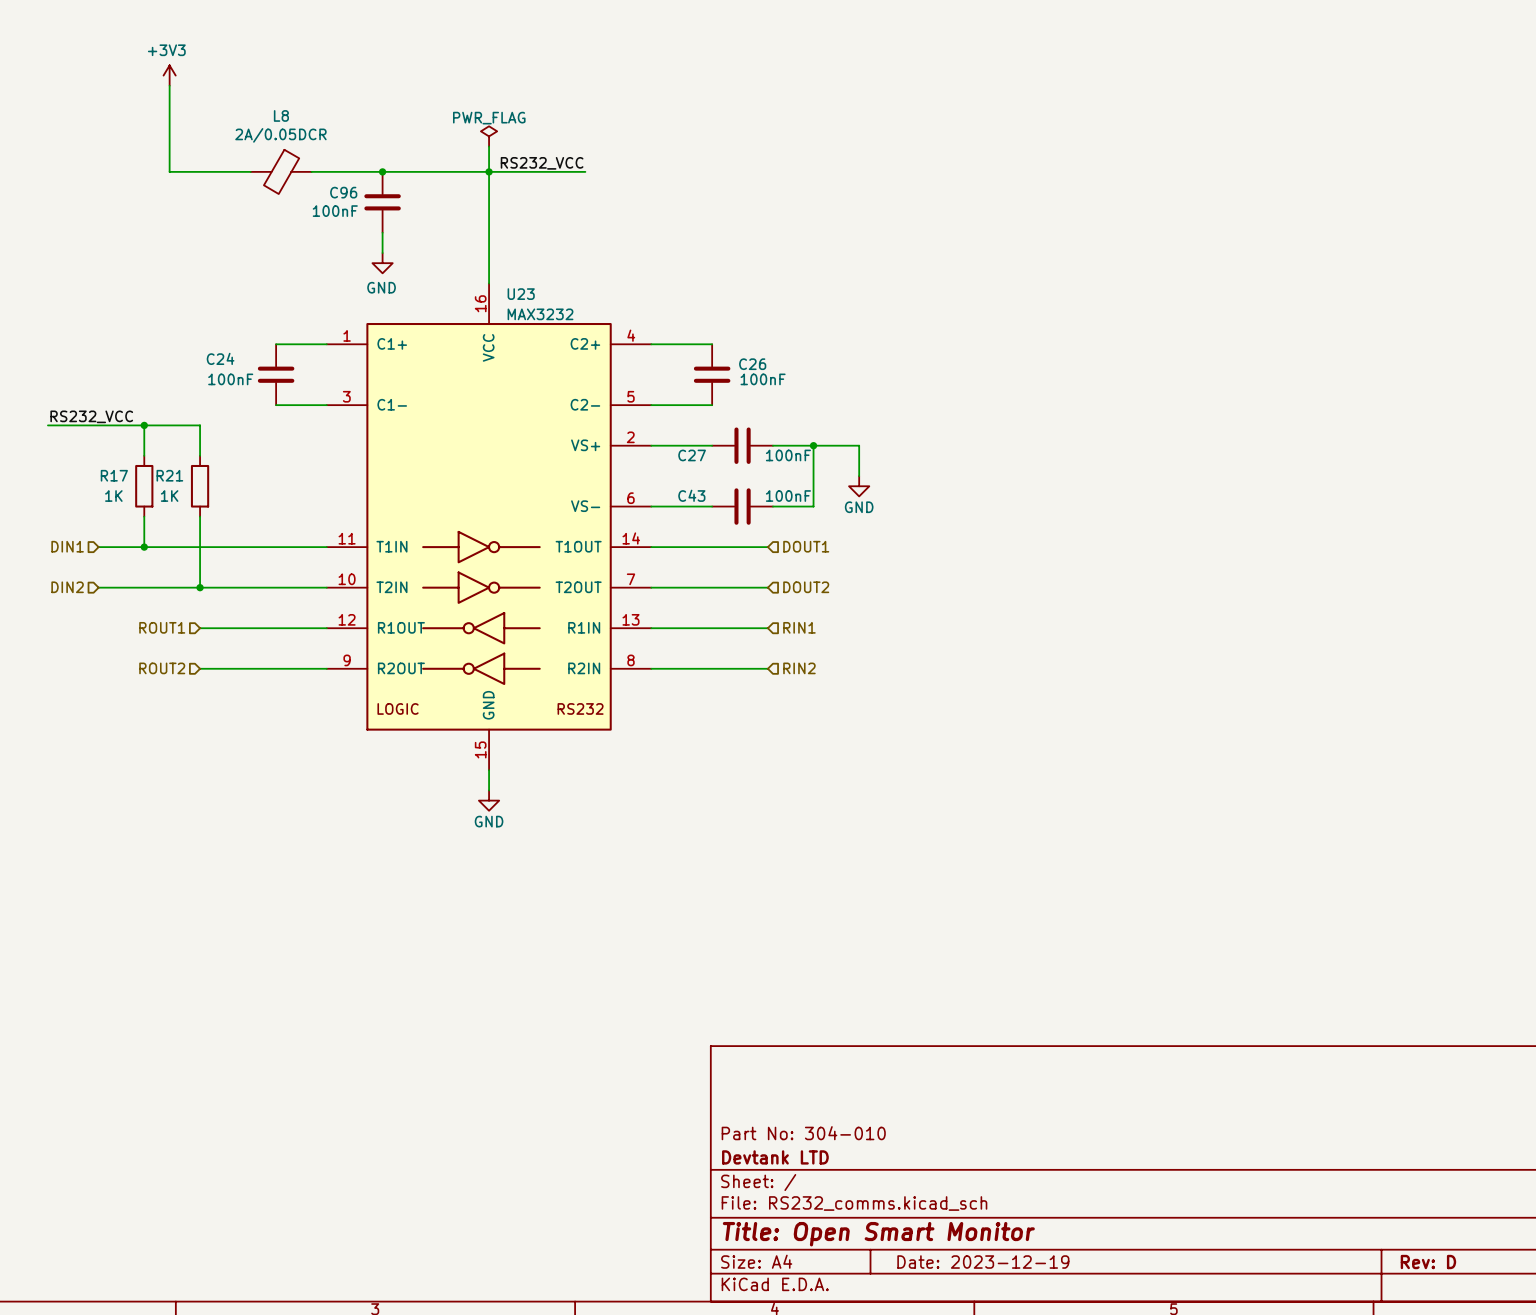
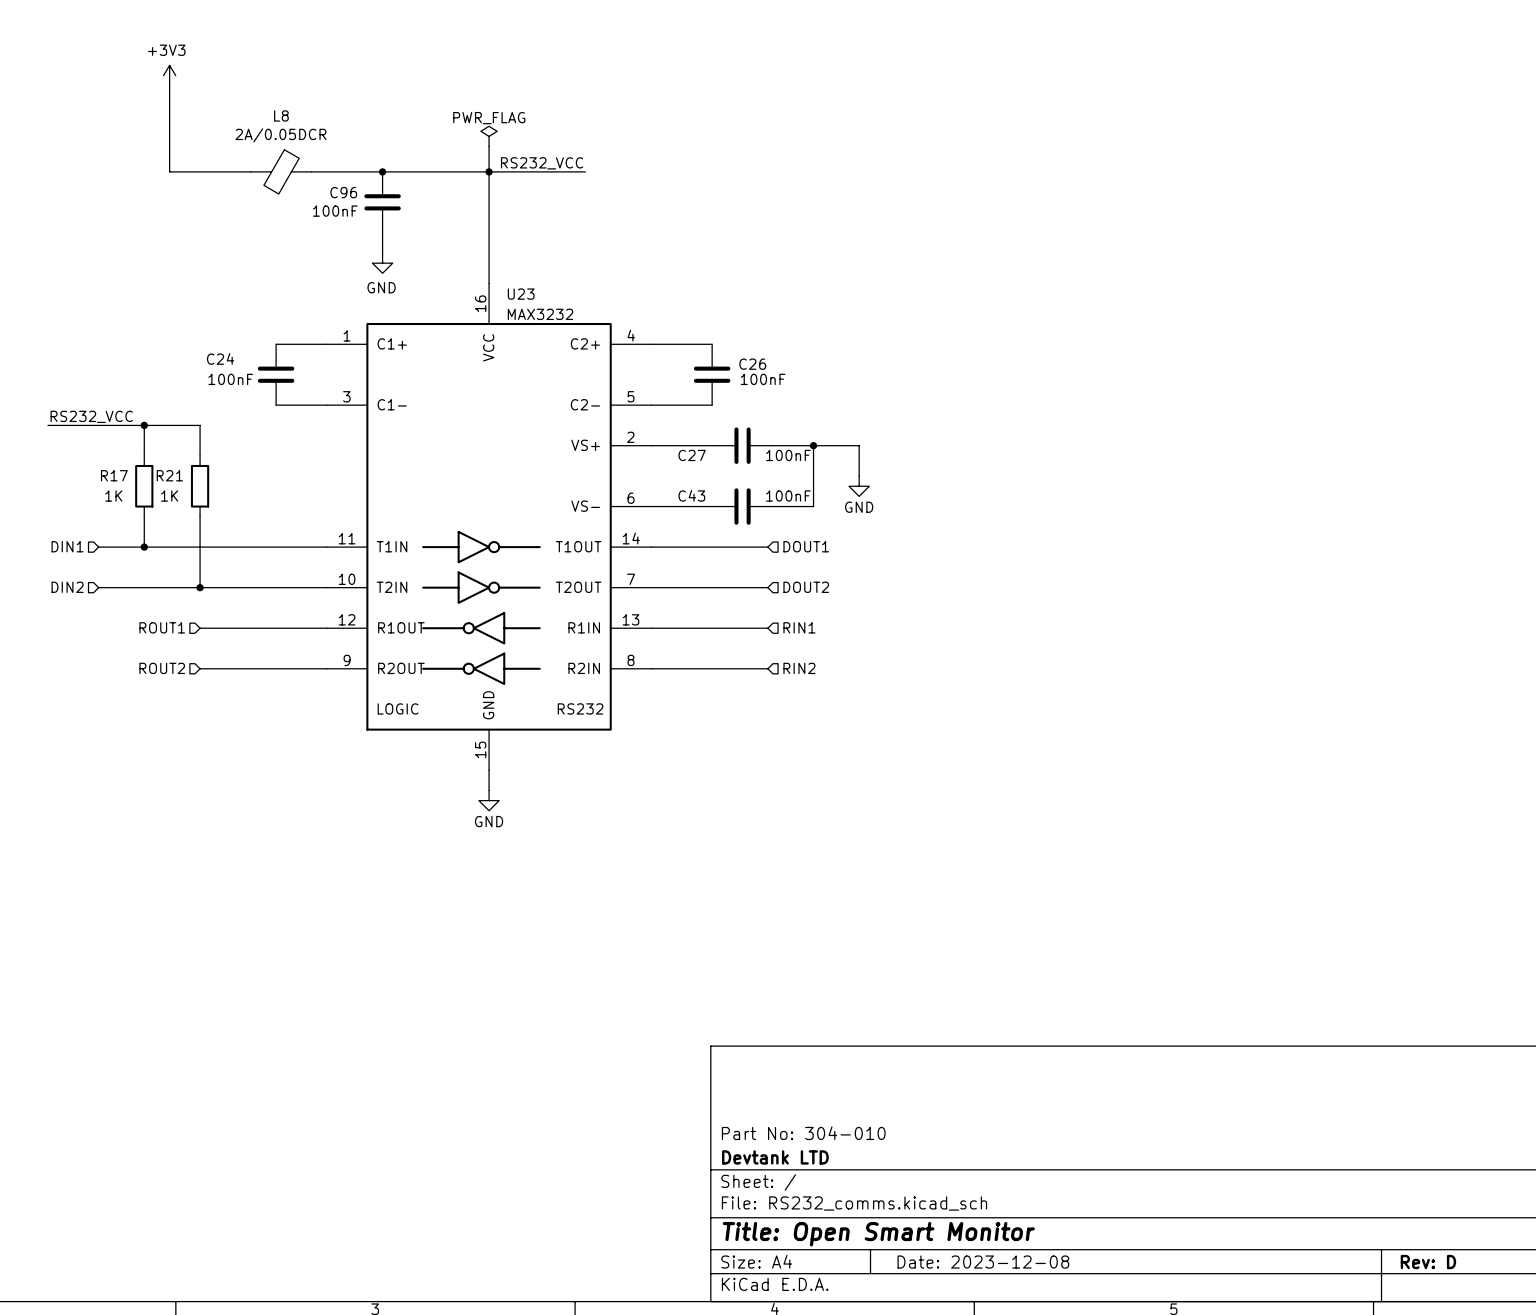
title block: Date: 2023-12-19 (983, 1262) -> Date: 2023-12-08 (983, 1262)

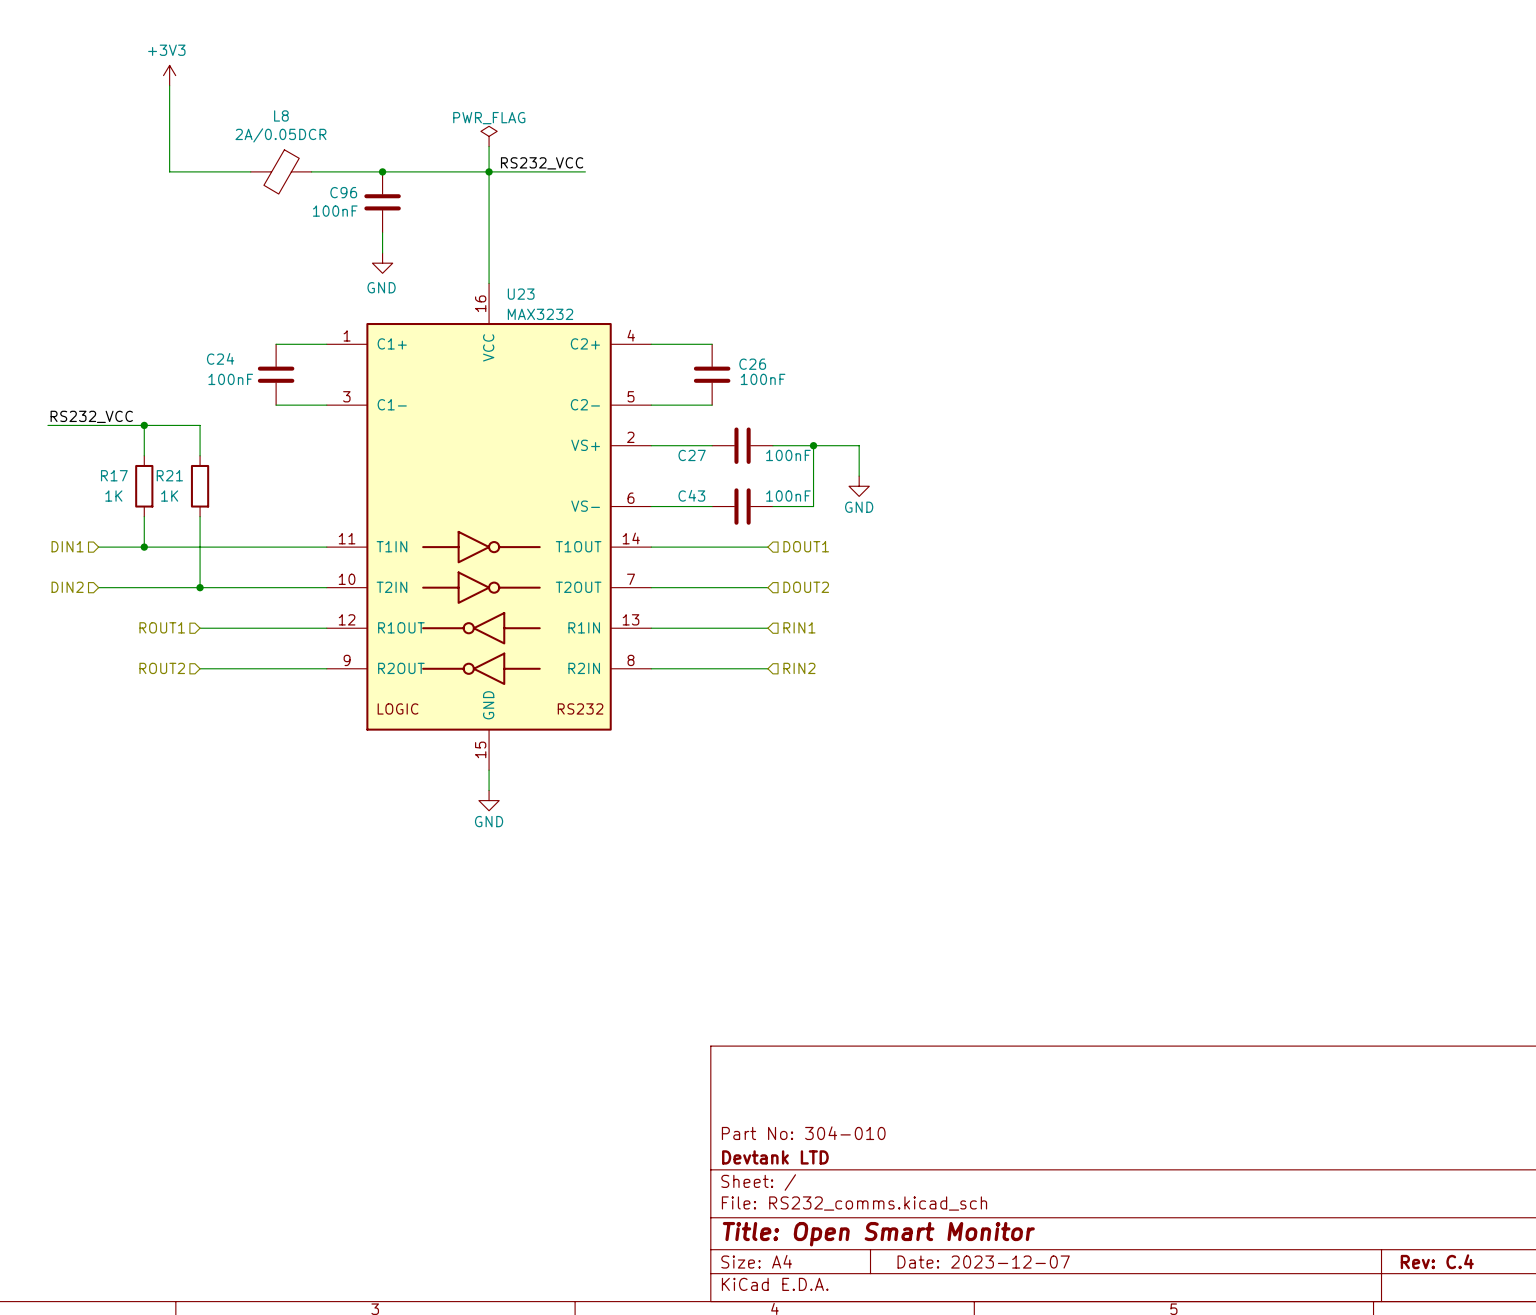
title block: Date: 2023-12-08 (983, 1262) -> Date: 2023-12-07 (983, 1262)
title block: Rev: D (1428, 1262) -> Rev: C.4 (1437, 1261)

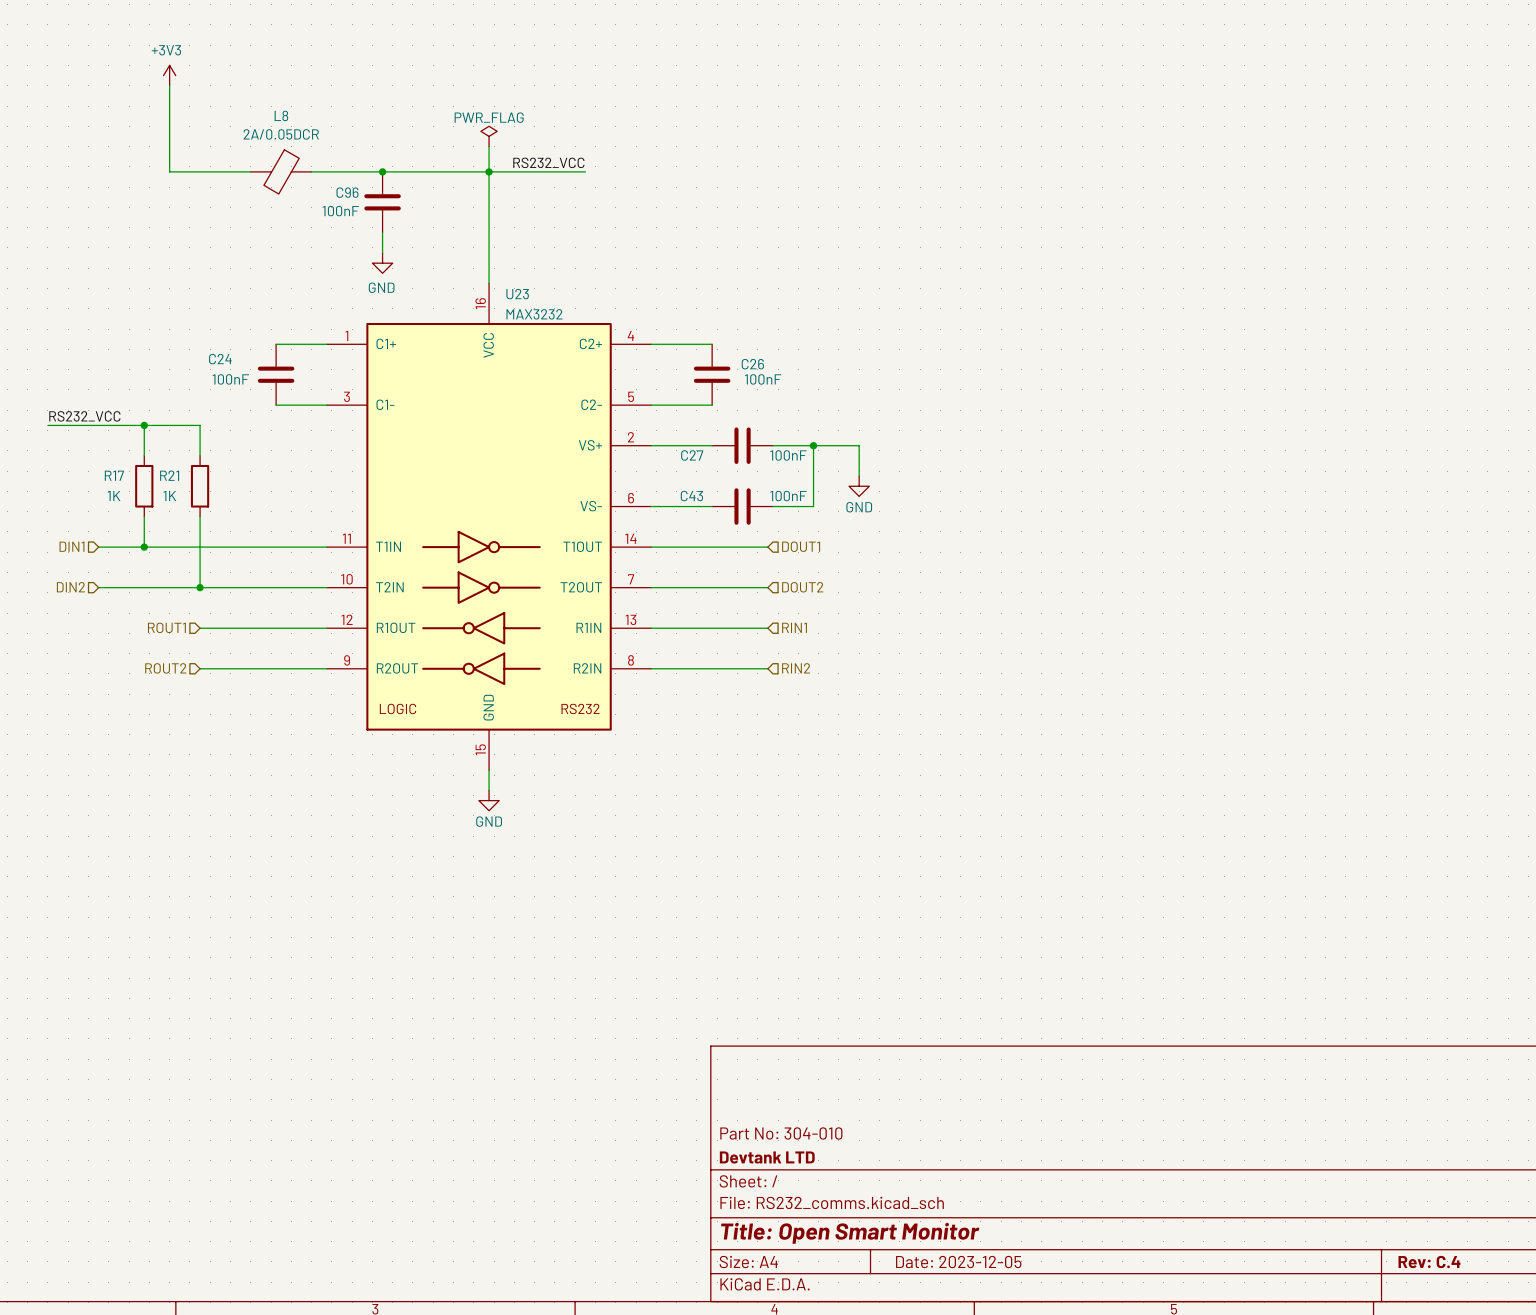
title block: Date: 2023-12-07 (983, 1262) -> Date: 2023-12-05 (958, 1262)

